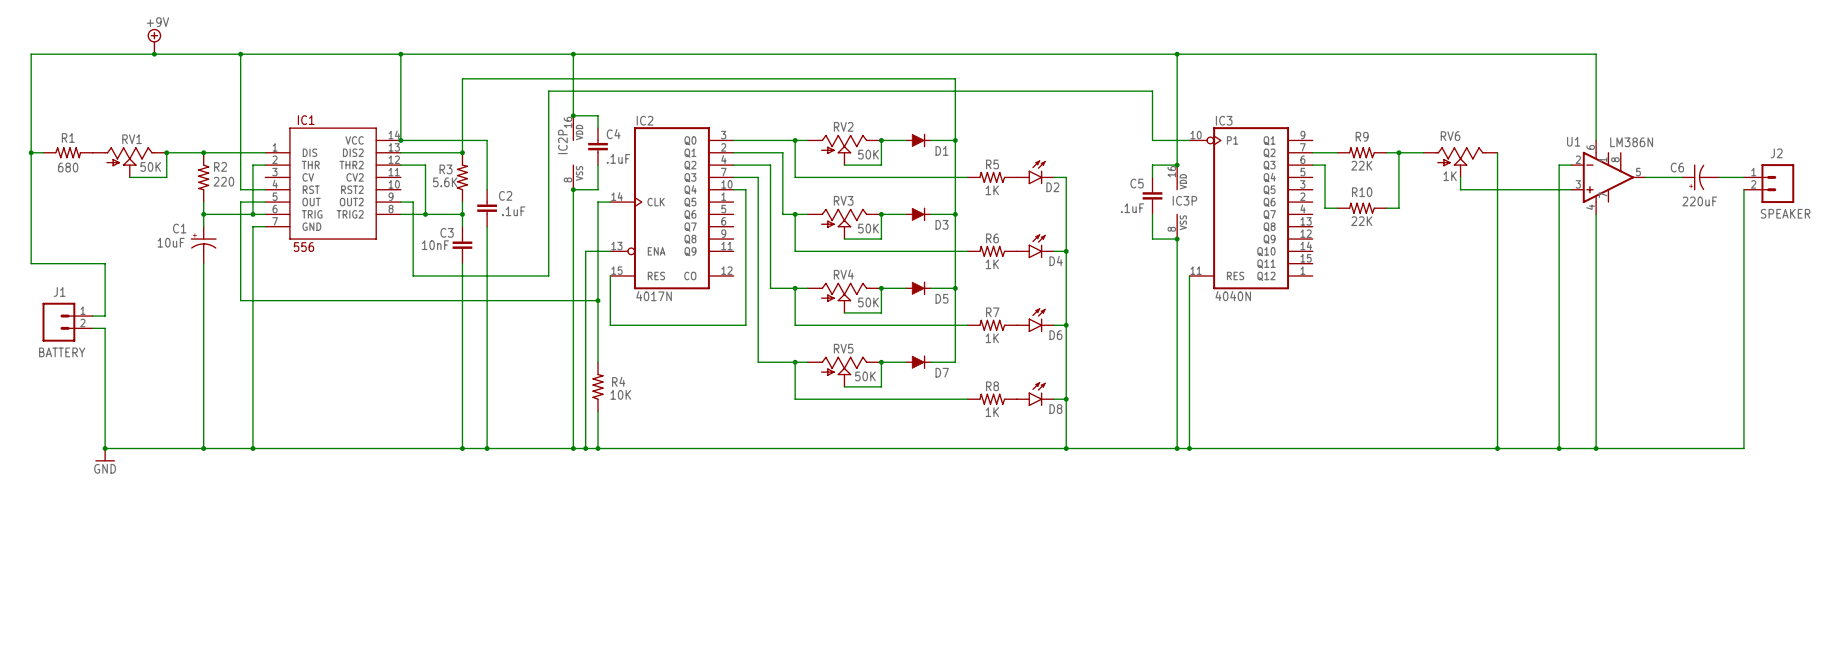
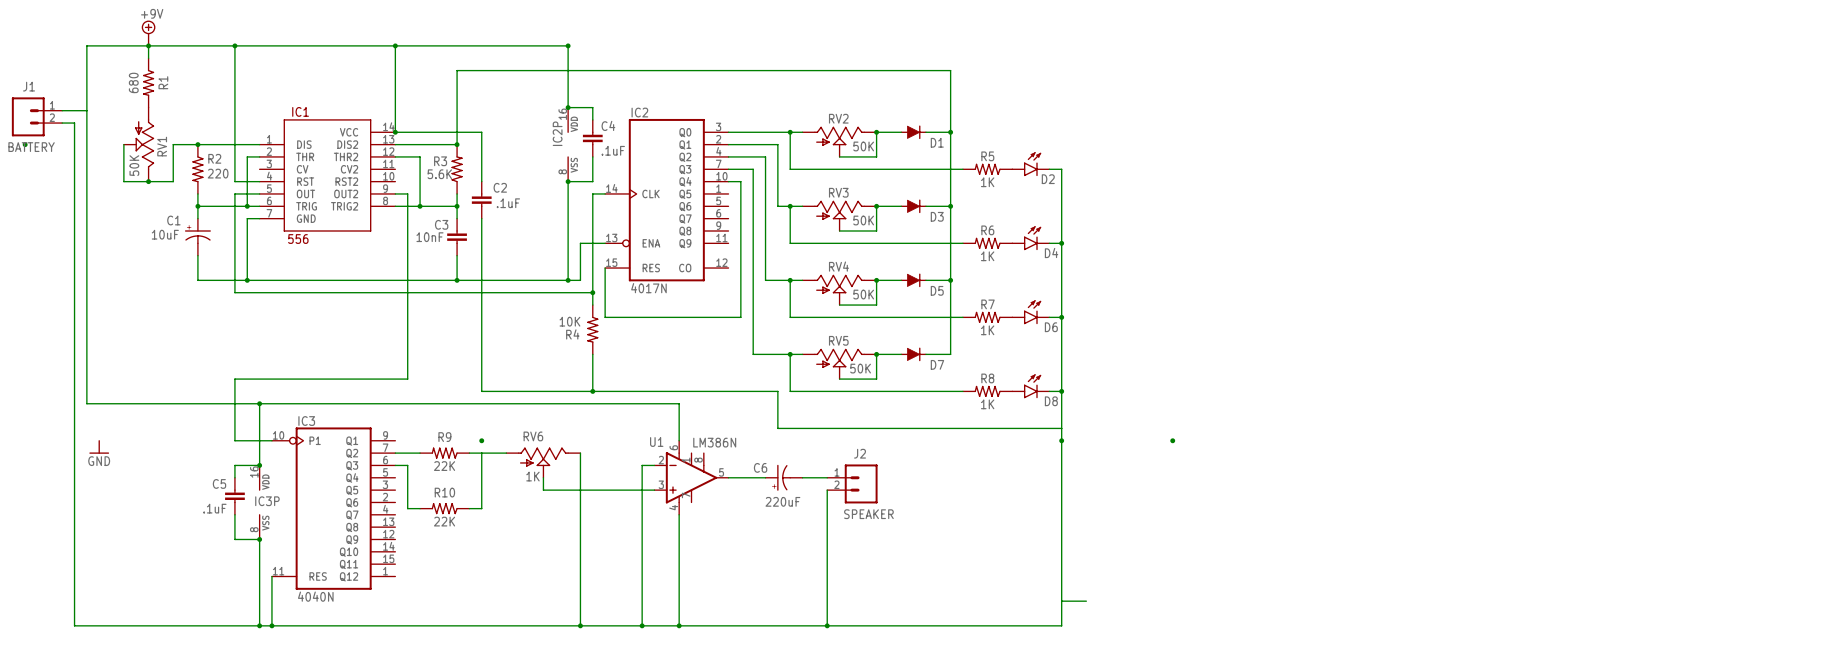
wire: (92, 54) (31, 54) (31, 263) (105, 263) (105, 316) (92, 316) -> (86, 45) (86, 403) (679, 403) (679, 440)
wire: none -> (148, 45) (148, 58)
wire: (573, 54) (1596, 54) (1596, 140) -> none
wire: (1177, 54) (1177, 165) (1152, 165) (1152, 177) -> none
junction: (1177, 54) -> none
wire: none -> (62, 110) (86, 110)
wire: none -> (62, 123) (74, 123) (74, 625) (1061, 625) (1061, 440)
wire: (1189, 140) (1152, 140) (1152, 91) (548, 91) (548, 275) (413, 275) -> none
wire: (31, 152) (43, 152) -> none
R1 rotation: 0° (68, 152) -> 90° clockwise (148, 82)
R1 position: (68, 152) -> (148, 82)
junction: (166, 152) -> none
wire: (179, 152) (166, 152) (166, 177) (129, 177) -> (173, 144) (173, 181) (123, 181) (123, 144)
wire: (1312, 152) (1337, 152) -> none
R9 position: (1361, 152) -> (444, 453)
wire: (1386, 152) (1423, 152) -> none
wire: (1398, 152) (1398, 208) (1386, 208) -> none
junction: (1398, 152) -> none
wire: (1497, 152) (1497, 448) -> none
RV1 rotation: 0° (129, 156) -> 90° clockwise (144, 144)
RV6 position: (1460, 162) -> (543, 462)
junction: (1177, 165) -> none
wire: (1312, 165) (1325, 165) (1325, 208) (1337, 208) -> none
wire: (1571, 165) (1559, 165) (1559, 448) -> none
wire: (1460, 177) (1460, 189) (1571, 189) -> none
U1 position: (1608, 177) -> (691, 477)
wire: (1645, 177) (1682, 177) -> none
C6 position: (1700, 177) -> (784, 477)
wire: (1719, 177) (1743, 177) -> none
J2 position: (1769, 183) -> (852, 483)
junction: none -> (148, 181)
wire: (1743, 189) (1743, 448) (277, 448) -> none
C5 position: (1152, 195) -> (234, 496)
IC3P position: (1177, 202) -> (259, 502)
IC3 position: (1251, 208) -> (333, 508)
R10 position: (1361, 208) -> (444, 508)
wire: (1152, 214) (1152, 239) (1177, 239) (1177, 448) -> none
wire: (1596, 214) (1596, 448) -> none
junction: (1177, 239) -> none
wire: (1189, 275) (1189, 448) -> none
wire: (203, 288) (203, 448) -> (197, 280) (580, 280)
wire: (252, 288) (252, 448) -> none
junction: none -> (247, 280)
wire: (462, 288) (462, 448) -> none
junction: none -> (457, 280)
wire: (573, 288) (573, 448) -> none
junction: none -> (568, 280)
wire: (585, 288) (585, 448) -> none
J1 position: (67, 322) -> (37, 116)
wire: (92, 328) (105, 328) (105, 448) (240, 448) -> (407, 268) (407, 379) (234, 379) (234, 440)
R4 rotation: 0° (598, 386) -> 180° (592, 329)
R4 position: (598, 386) -> (592, 329)
wire: (487, 399) (487, 448) -> (481, 391) (777, 391) (777, 428) (1061, 428)
junction: none -> (592, 391)
wire: none -> (259, 403) (259, 465) (234, 465) (234, 477)
junction: none -> (259, 403)
wire: (598, 411) (598, 448) -> none
junction: (105, 448) -> none
junction: (203, 448) -> none
junction: (252, 448) -> none
junction: (462, 448) -> none
junction: (573, 448) -> none
junction: (585, 448) -> none
junction: (598, 448) -> none
junction: (1189, 448) -> none
junction: (1497, 448) -> none
junction: (1559, 448) -> none
junction: (1596, 448) -> none
wire: none -> (395, 453) (420, 453)
wire: none -> (469, 453) (506, 453)
wire: none -> (481, 453) (481, 508) (469, 508)
wire: none -> (580, 453) (580, 625)
junction: none -> (259, 465)
wire: none -> (395, 465) (407, 465) (407, 508) (420, 508)
wire: none -> (654, 465) (642, 465) (642, 625)
wire: none -> (543, 477) (543, 490) (654, 490)
wire: none -> (728, 477) (765, 477)
wire: none -> (802, 477) (827, 477)
wire: none -> (827, 490) (827, 625)
wire: none -> (234, 514) (234, 539) (259, 539) (259, 625)
wire: none -> (679, 514) (679, 625)
junction: none -> (259, 539)
wire: none -> (271, 576) (271, 625)
wire: none -> (1061, 601) (1086, 601)
junction: none -> (259, 625)
junction: none -> (271, 625)
junction: none -> (580, 625)
junction: none -> (642, 625)
junction: none -> (679, 625)
junction: none -> (827, 625)

